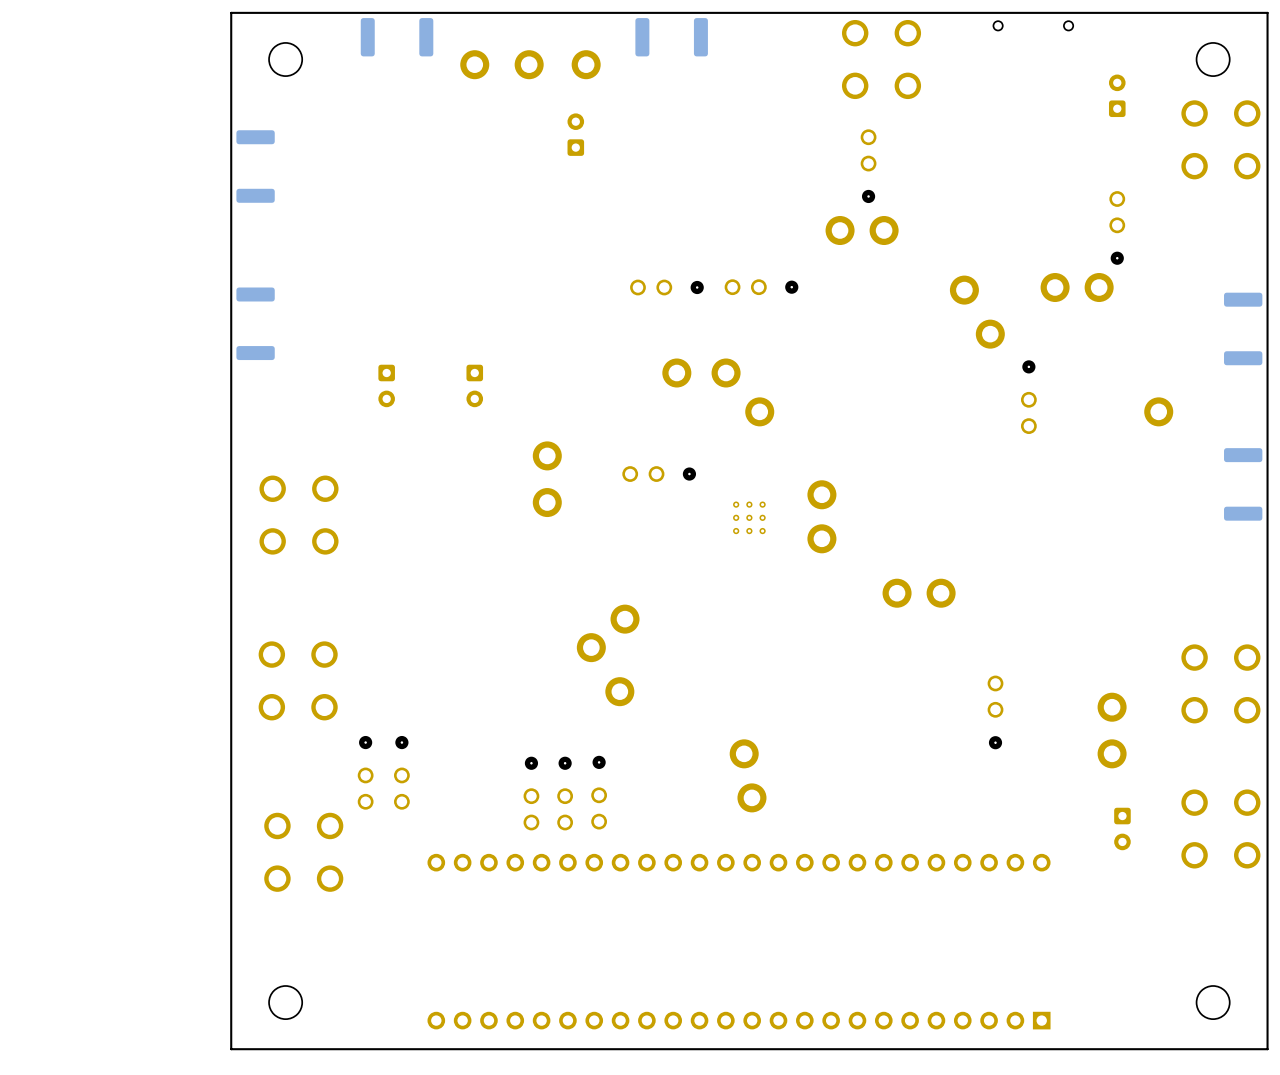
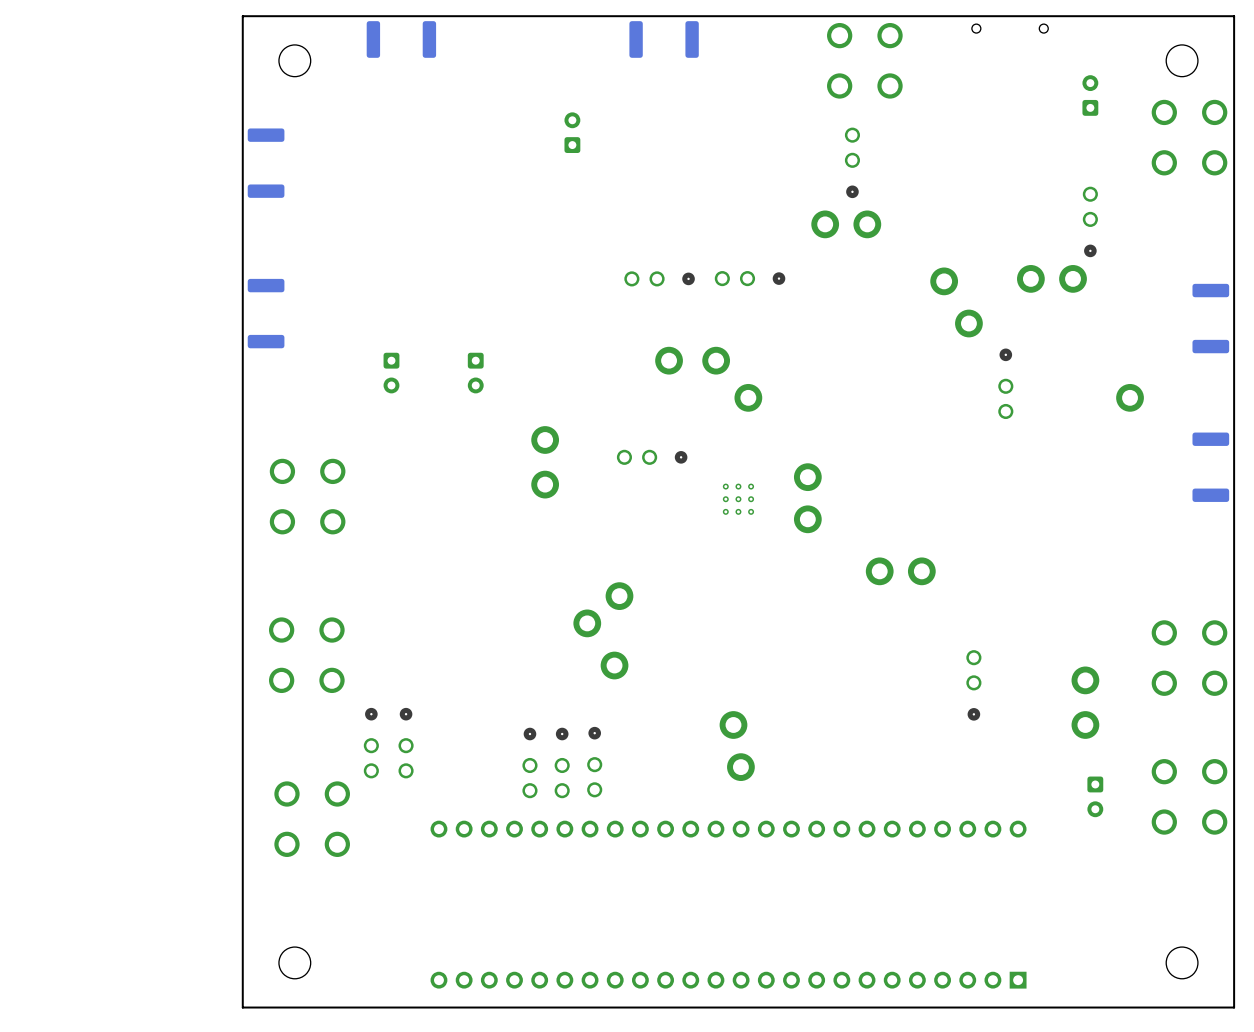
part: (474, 64) -> none
part: (529, 64) -> none
part: (586, 64) -> none

